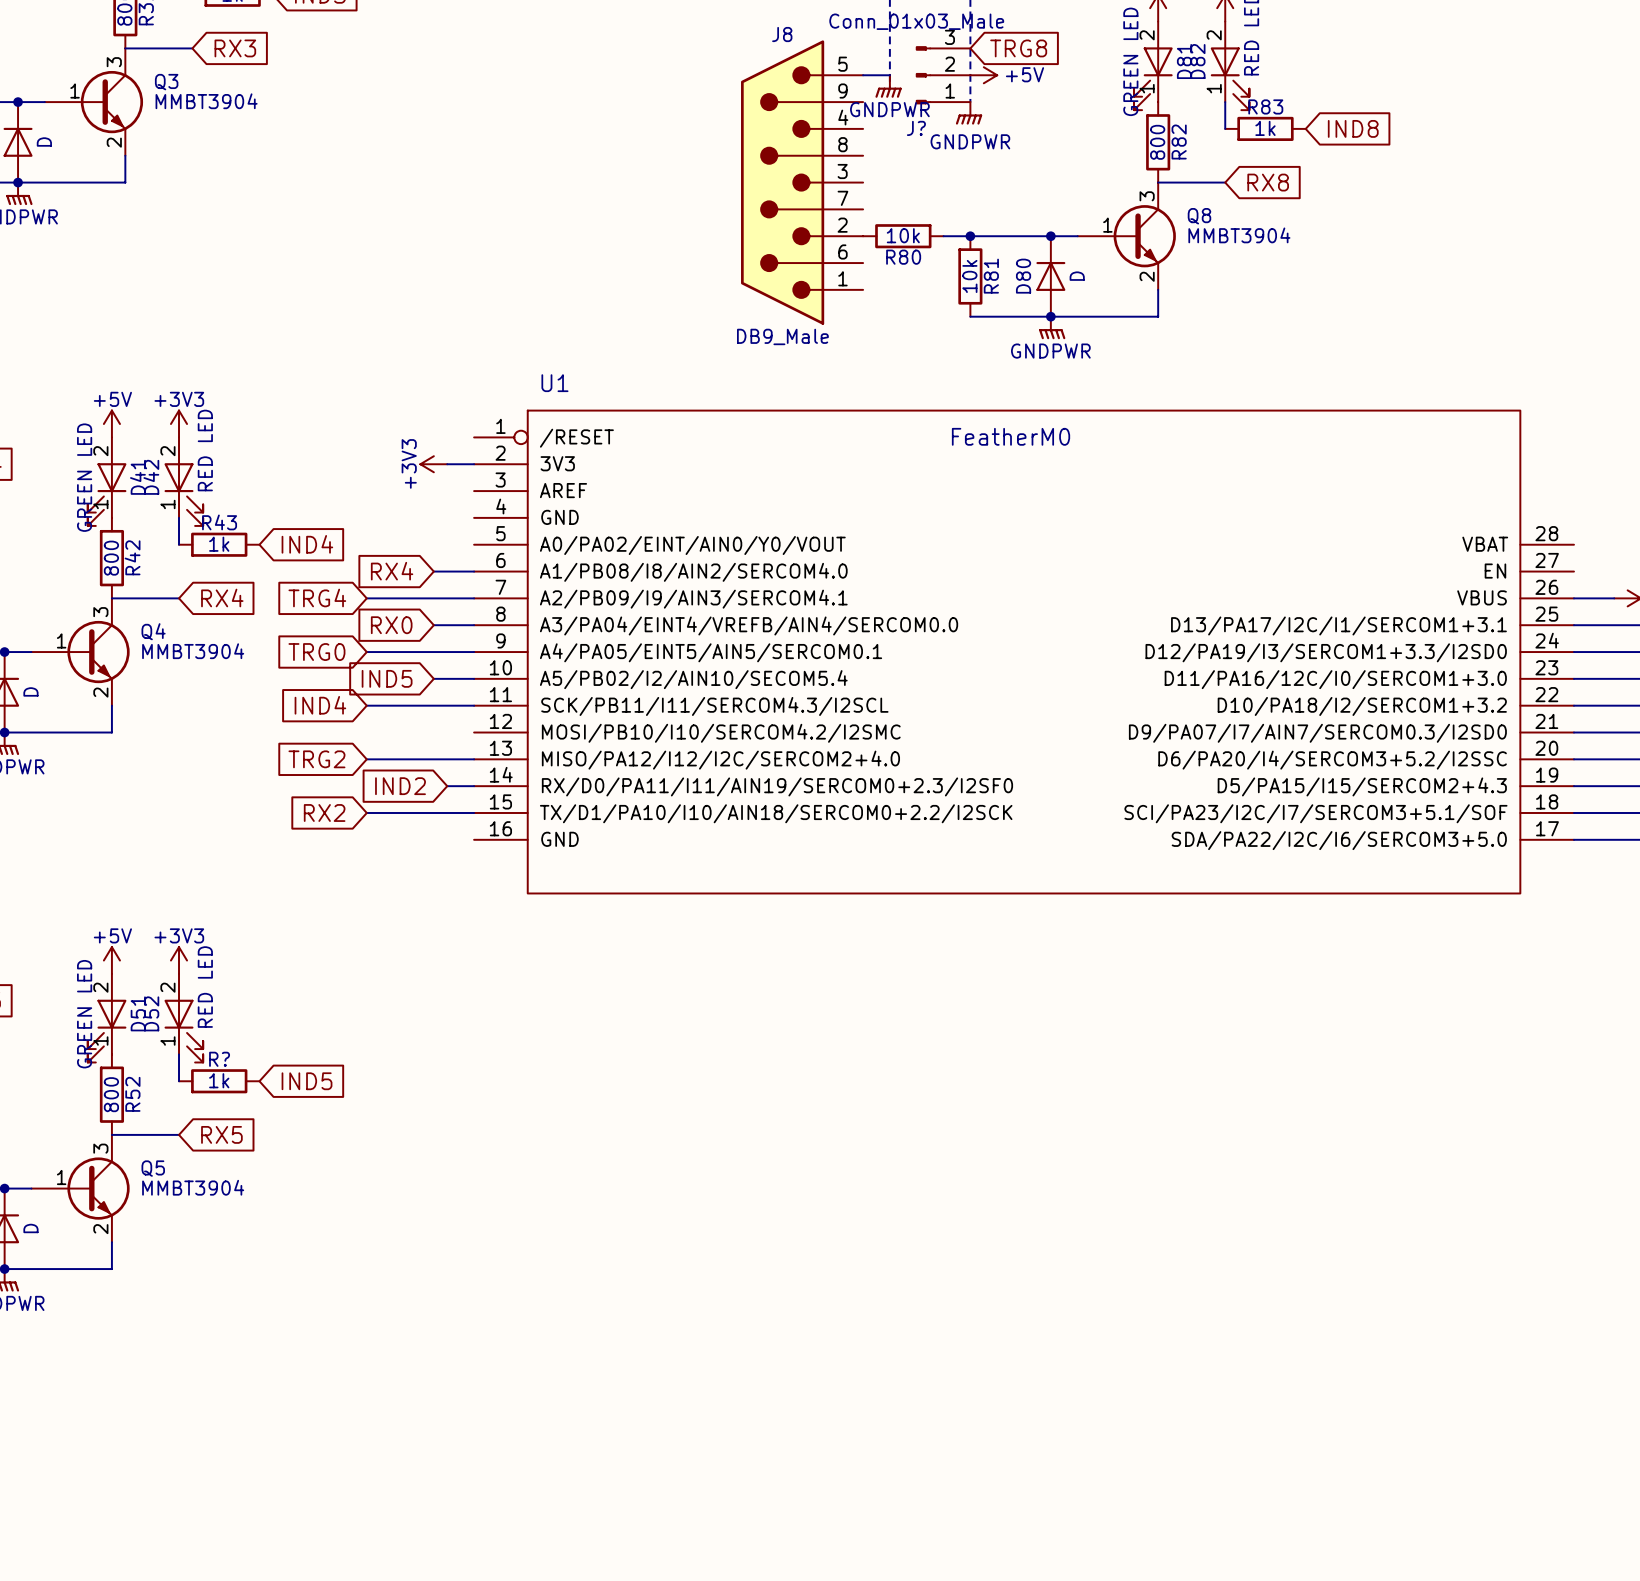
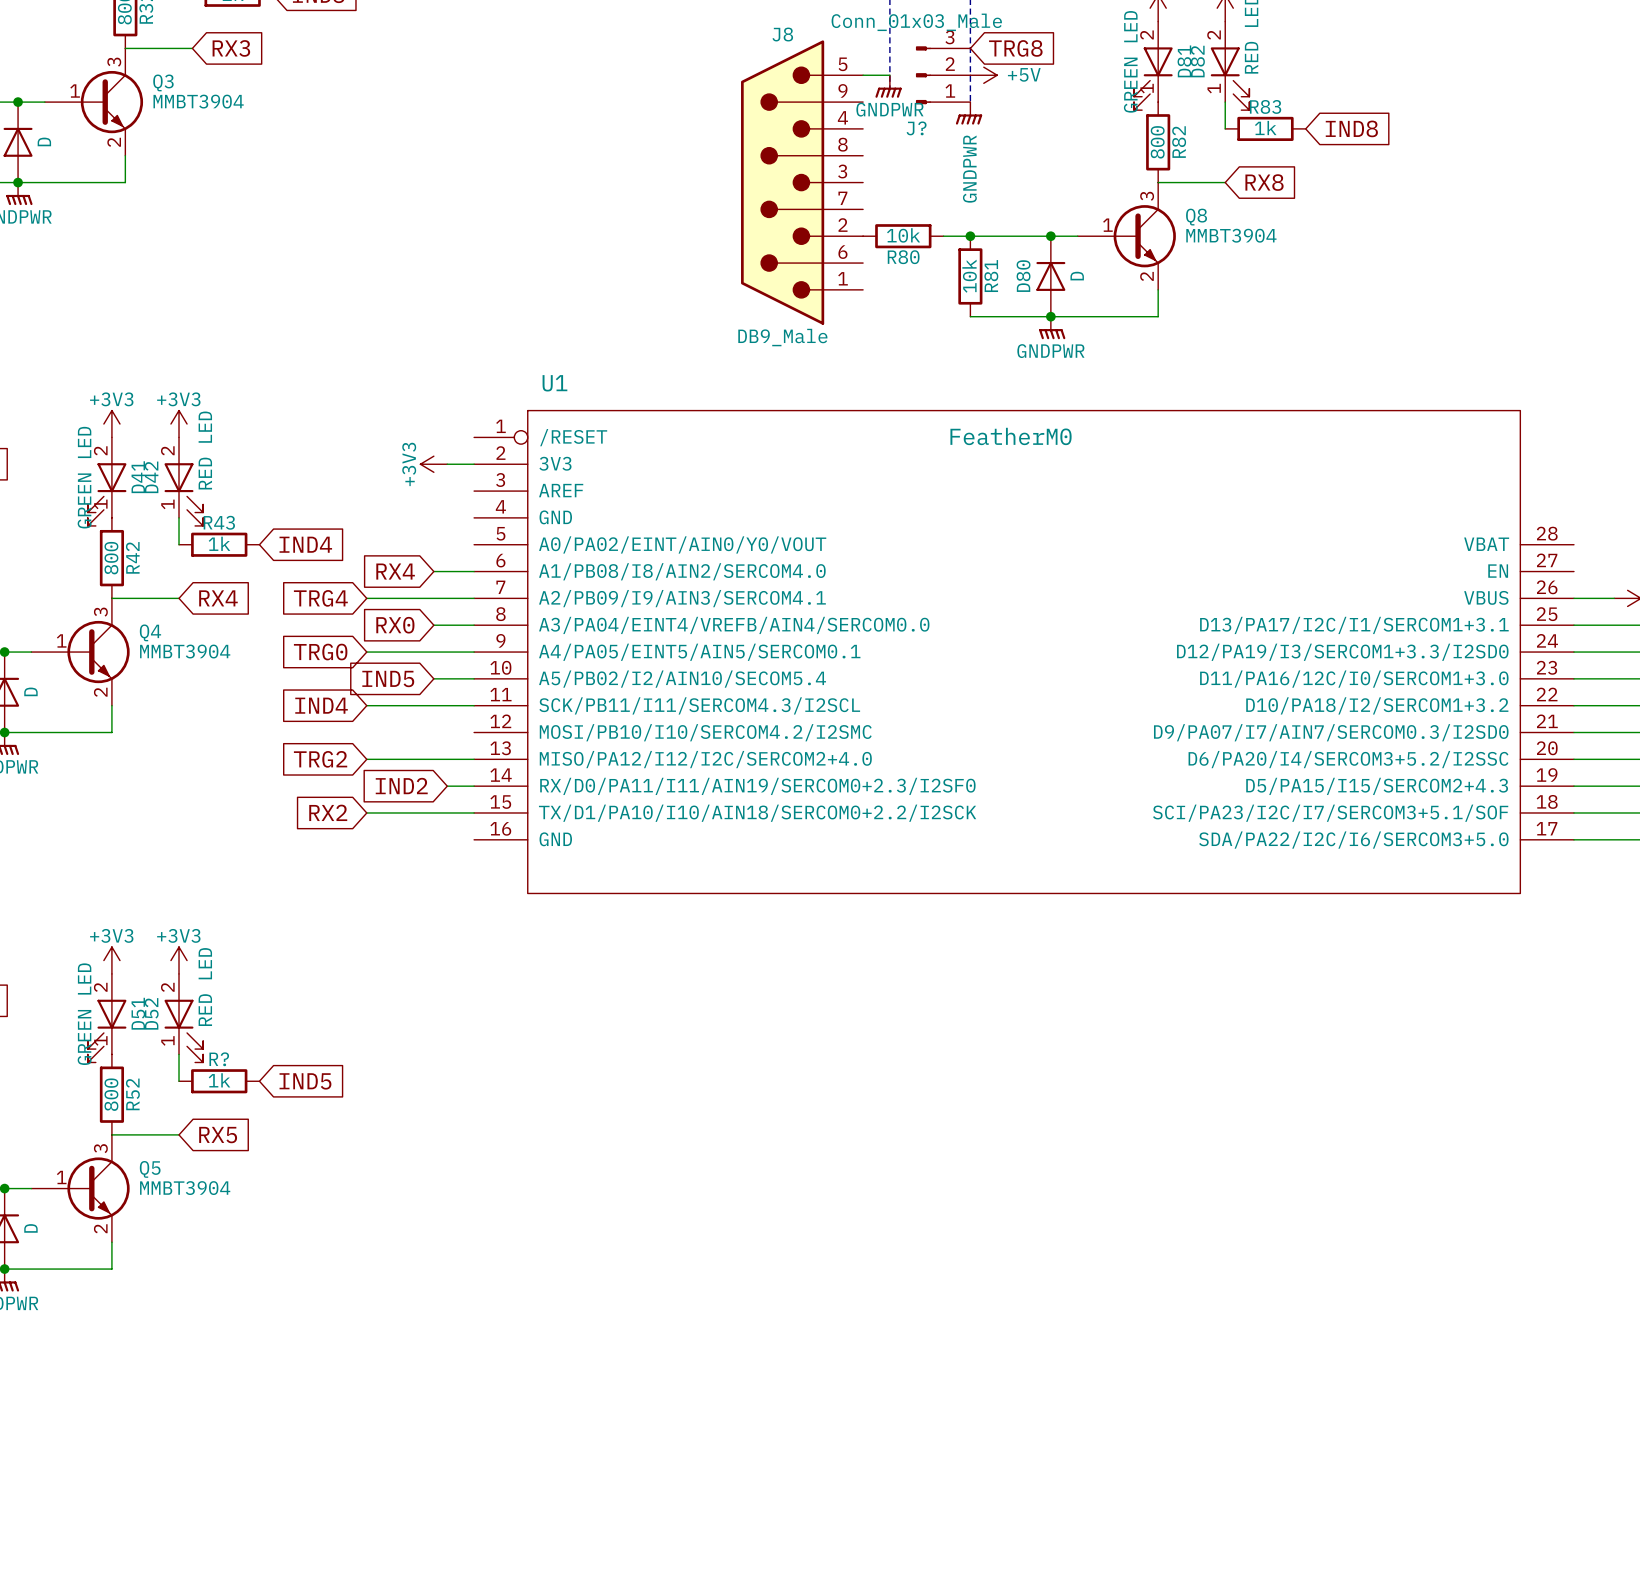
power symbol text rotation: 0° (970, 141) -> 90° counterclockwise (969, 169)
power symbol: +5V (111, 424) -> +3V3 (111, 424)
power symbol: +5V (111, 960) -> +3V3 (111, 960)

